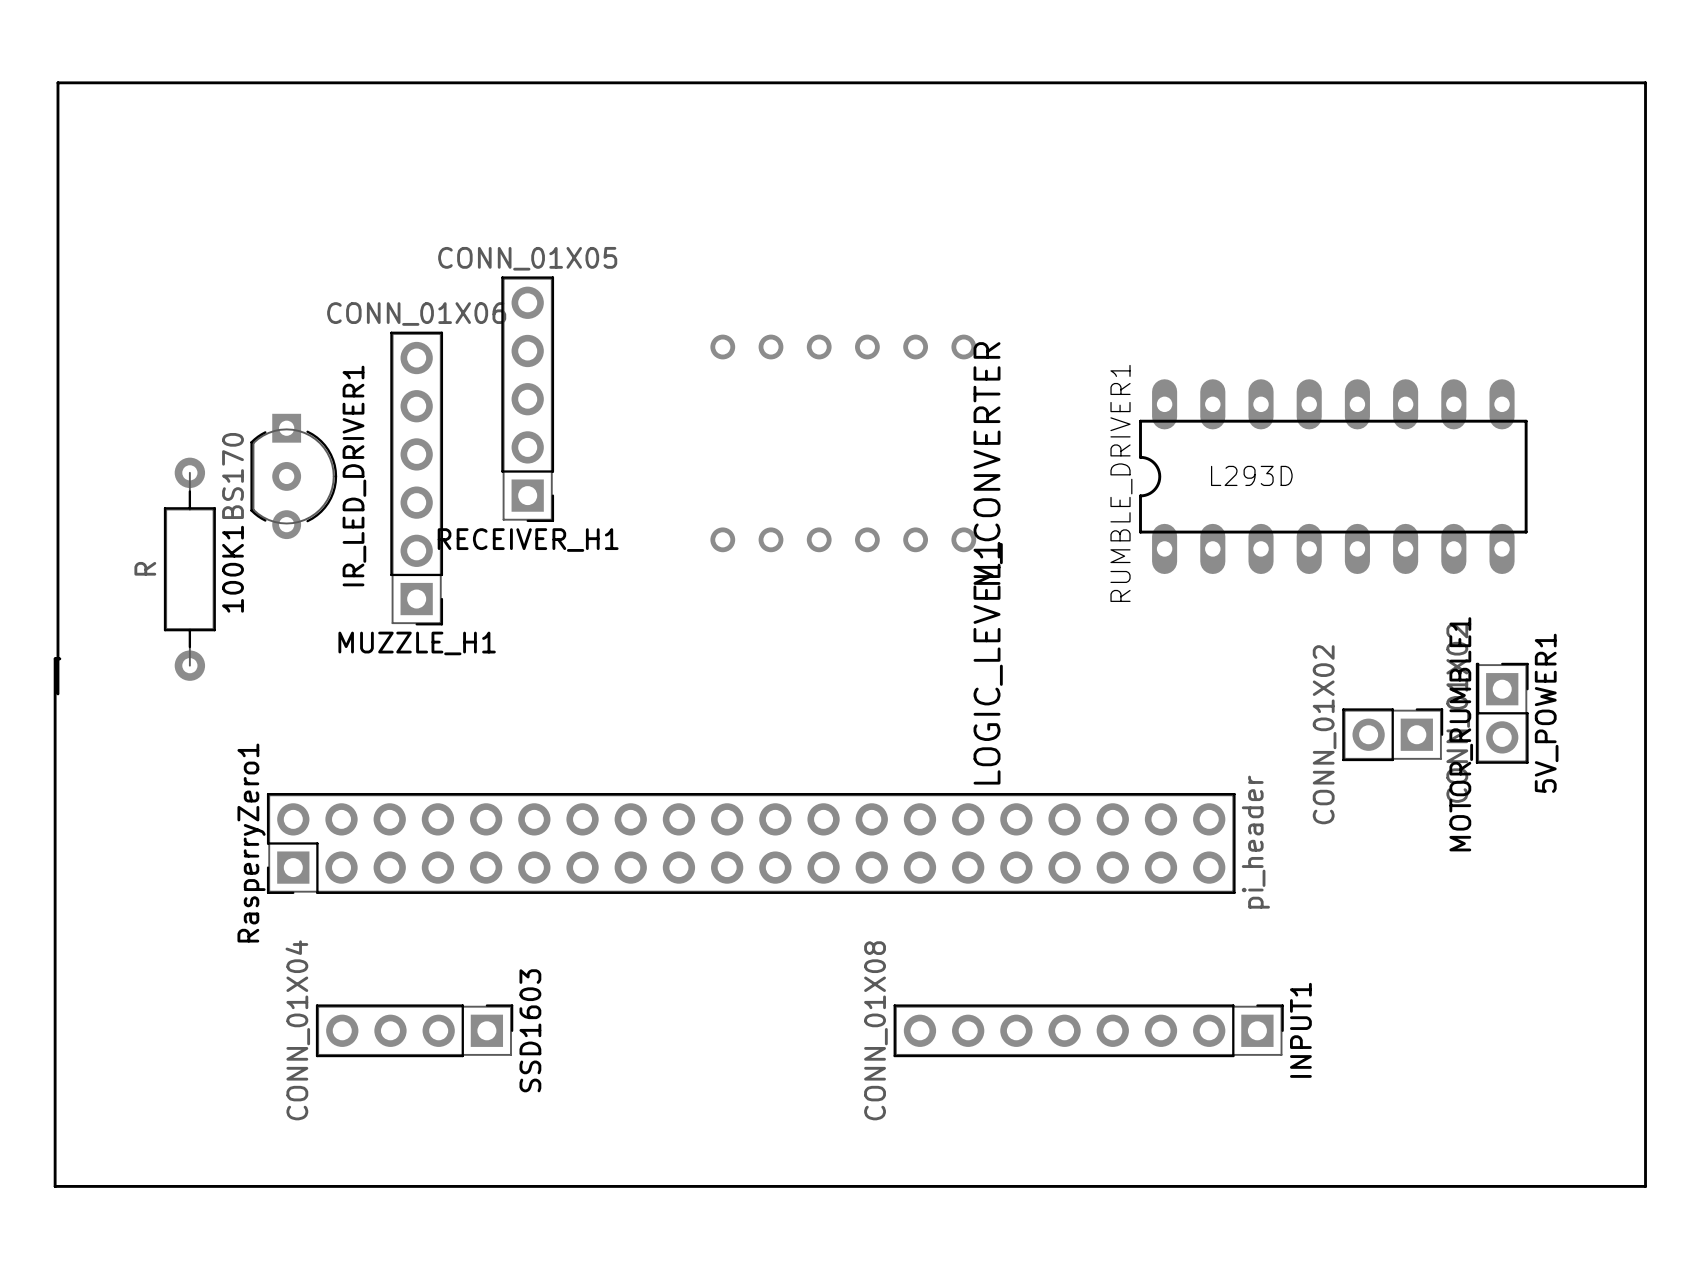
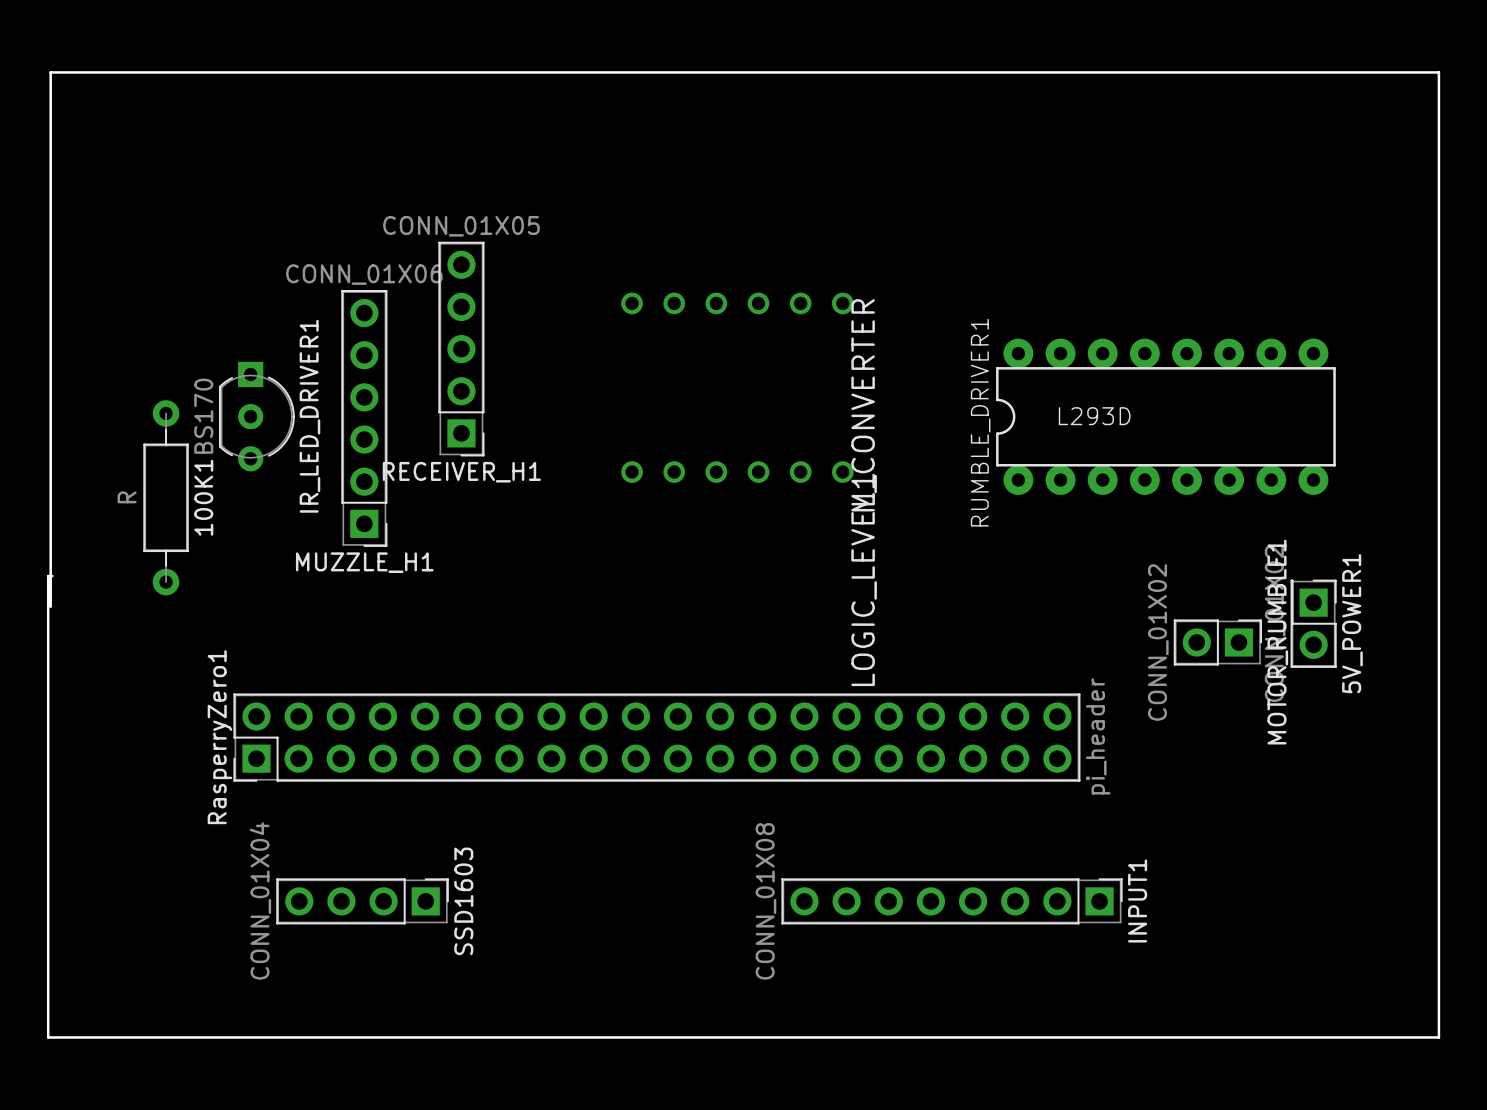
RUMBLE_DRIVER1 footprint: [1139, 379, 1528, 575] -> [996, 338, 1336, 495]

